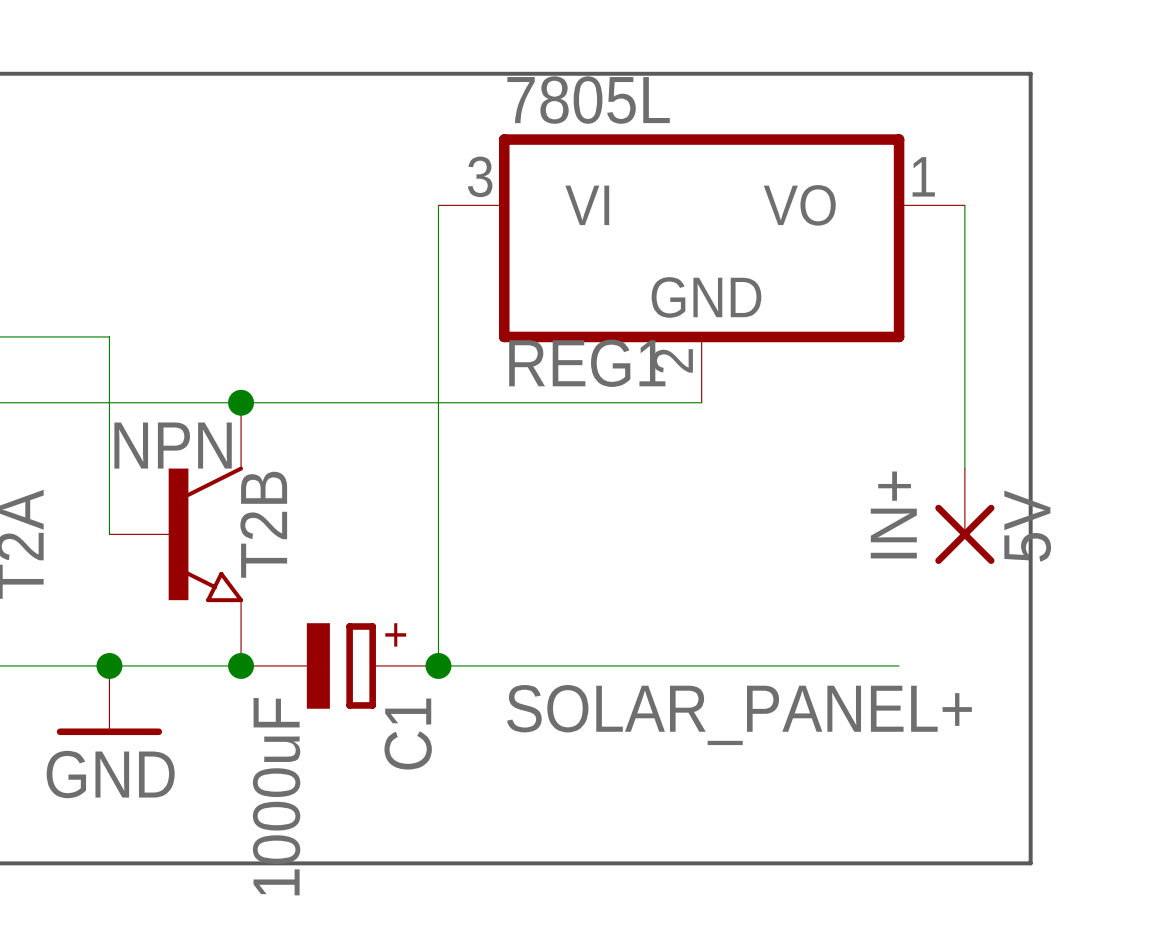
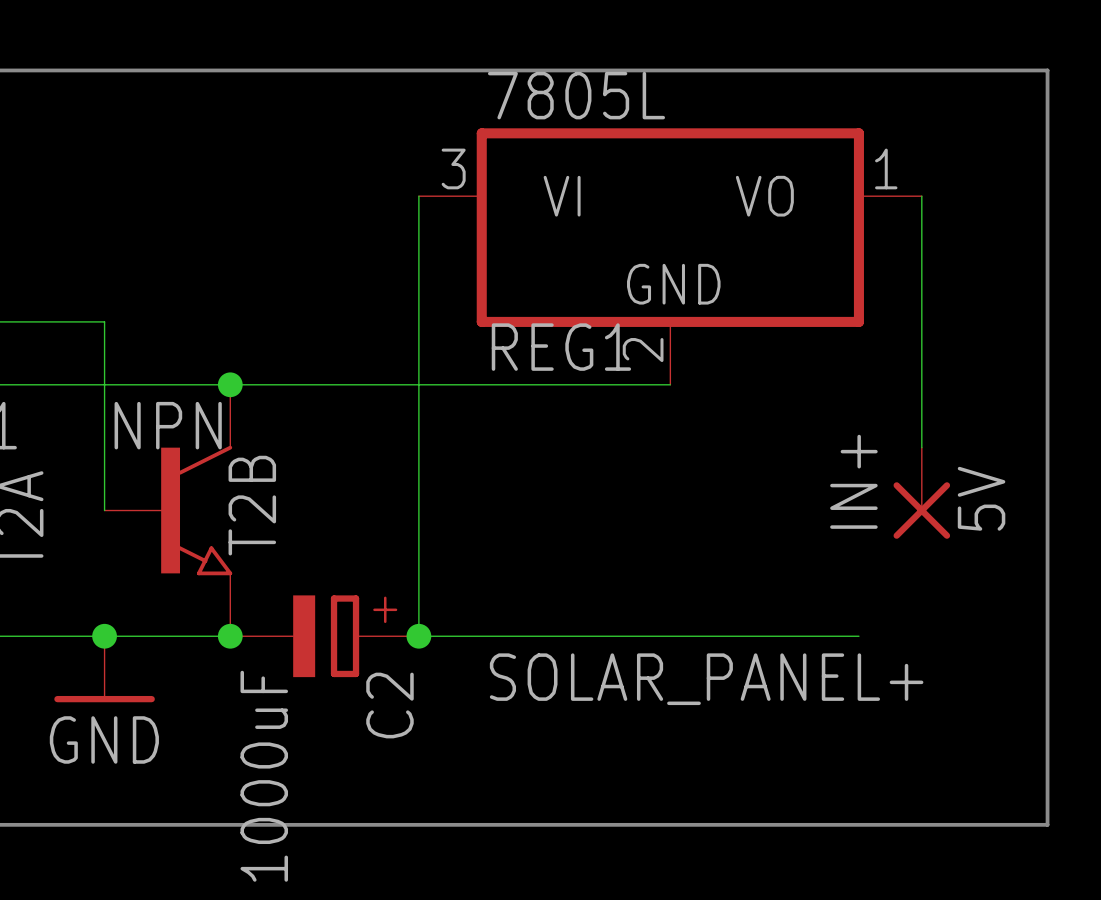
line: (1030, 73) (1030, 863) -> (984, 70) (1047, 70) (1047, 824) (984, 824)
C1 name: C1 (408, 734) -> C2 (389, 705)

